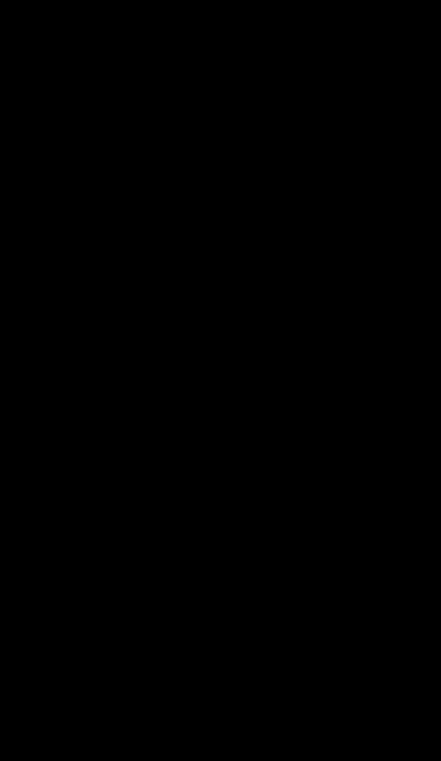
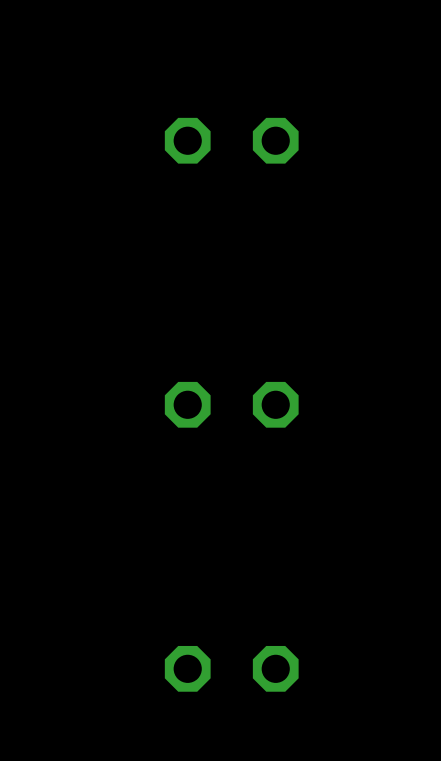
part: none -> (231, 140)
part: none -> (231, 404)
part: none -> (231, 668)

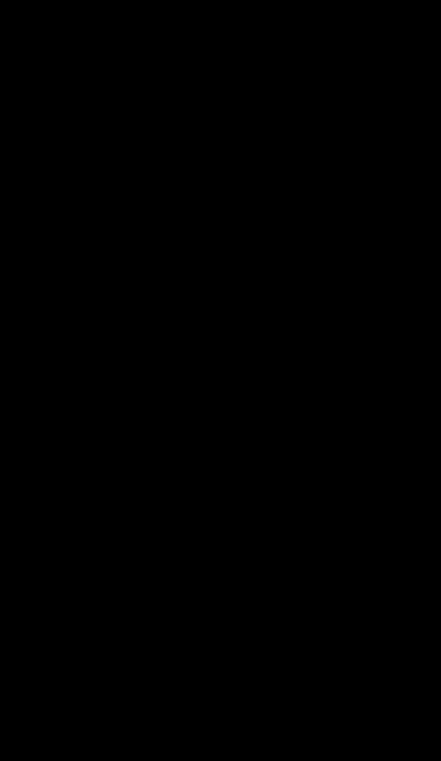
part: (231, 140) -> none
part: (231, 404) -> none
part: (231, 668) -> none

